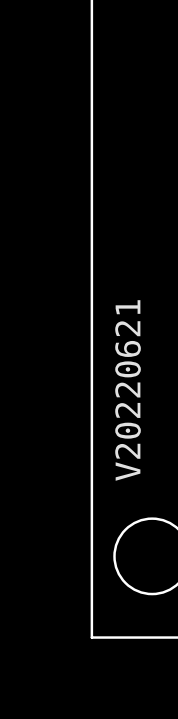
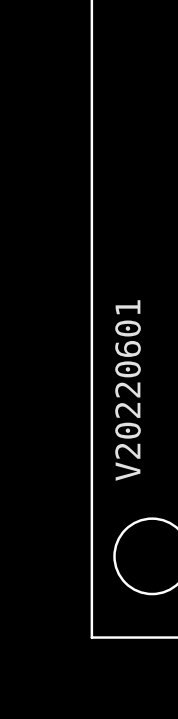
text: V20220621 (128, 390) -> V20220601 (128, 390)

